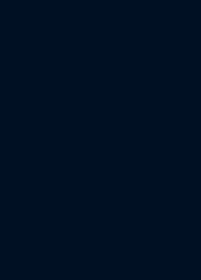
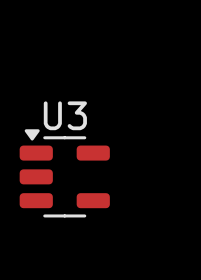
U3: none -> (64, 173)

